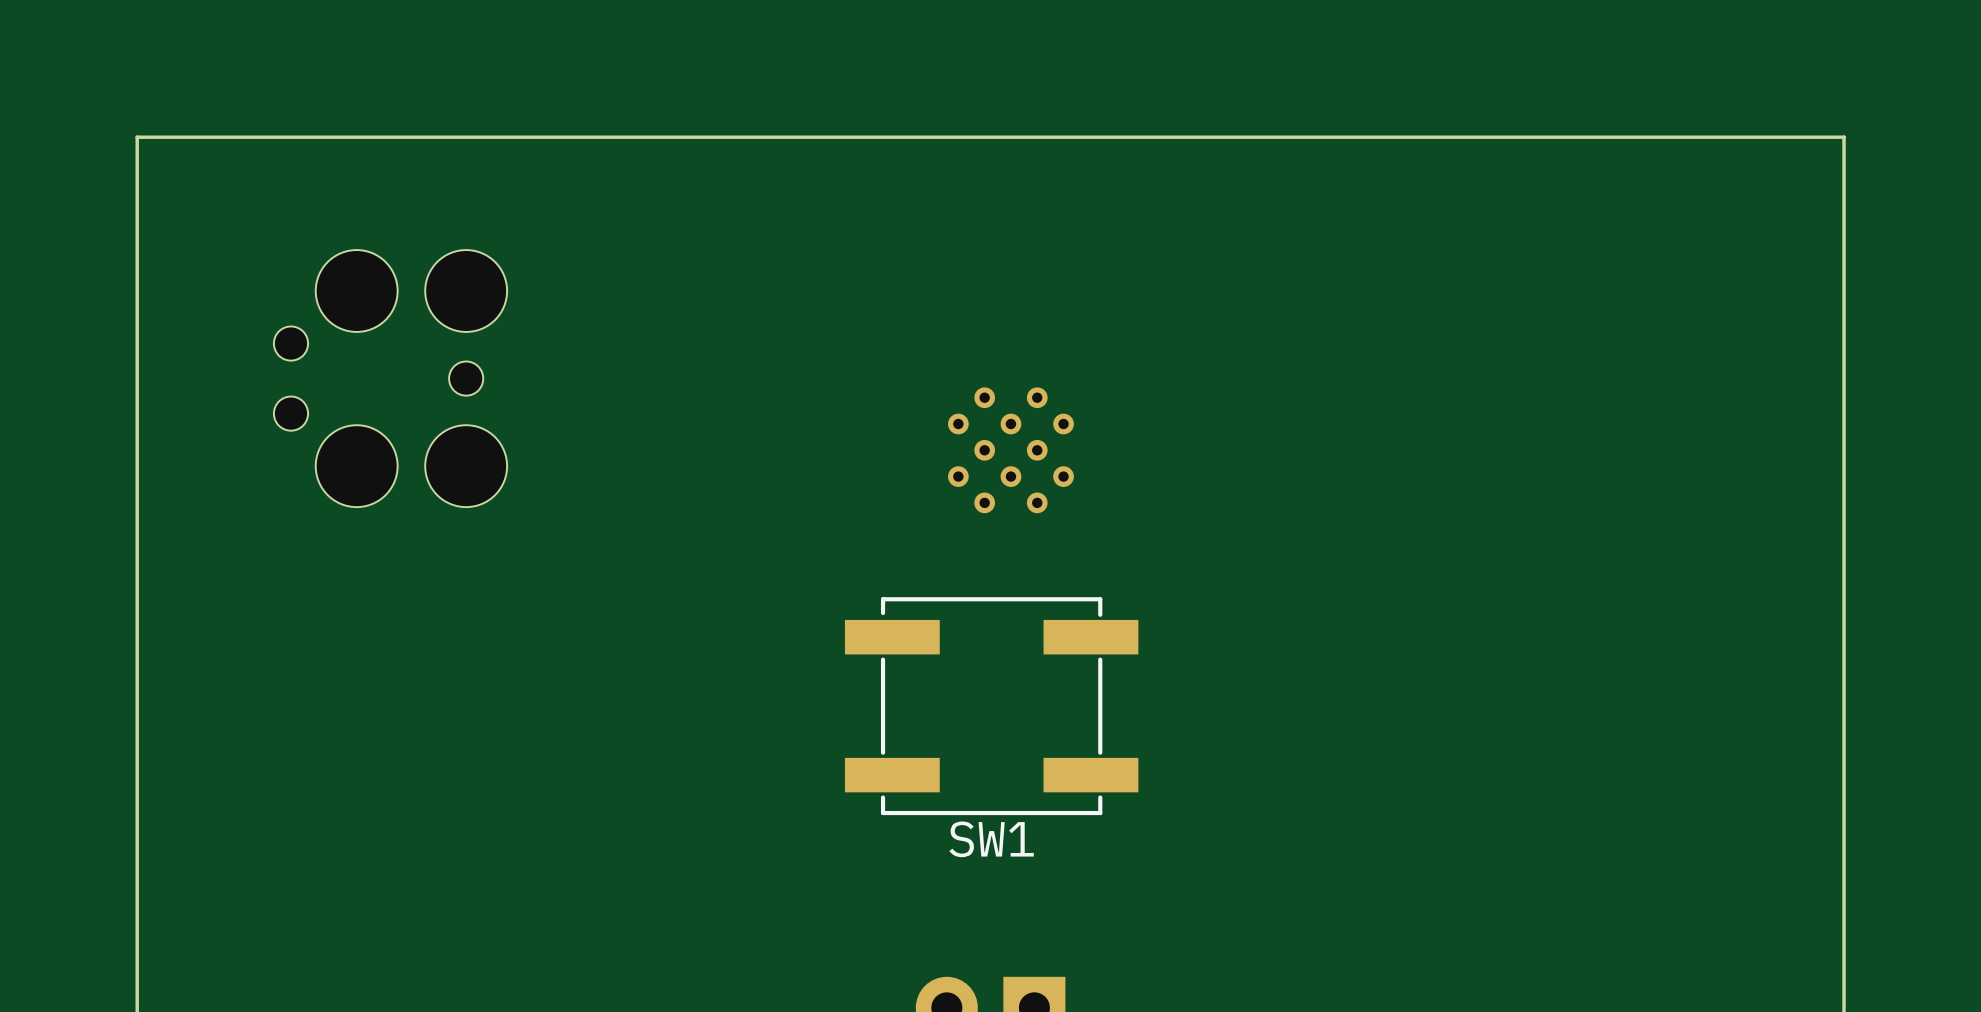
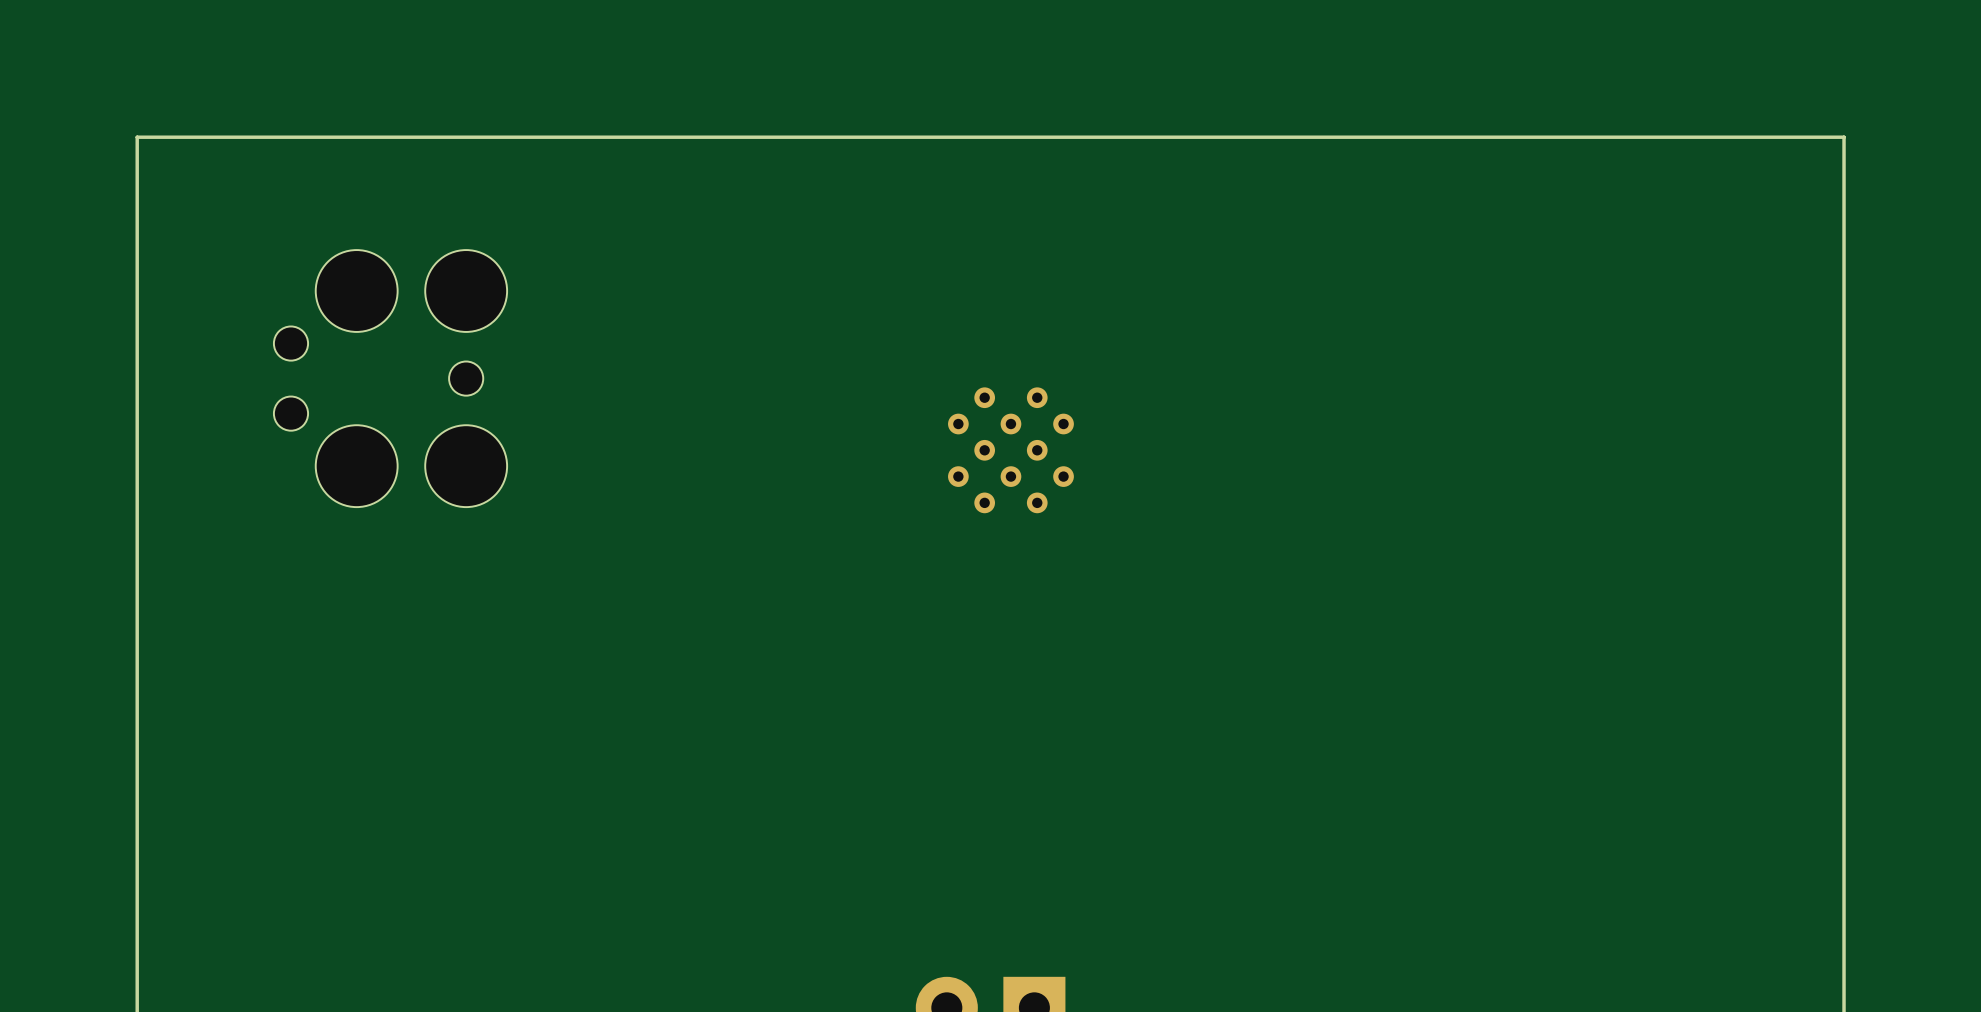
SW1: (991, 706) -> none

